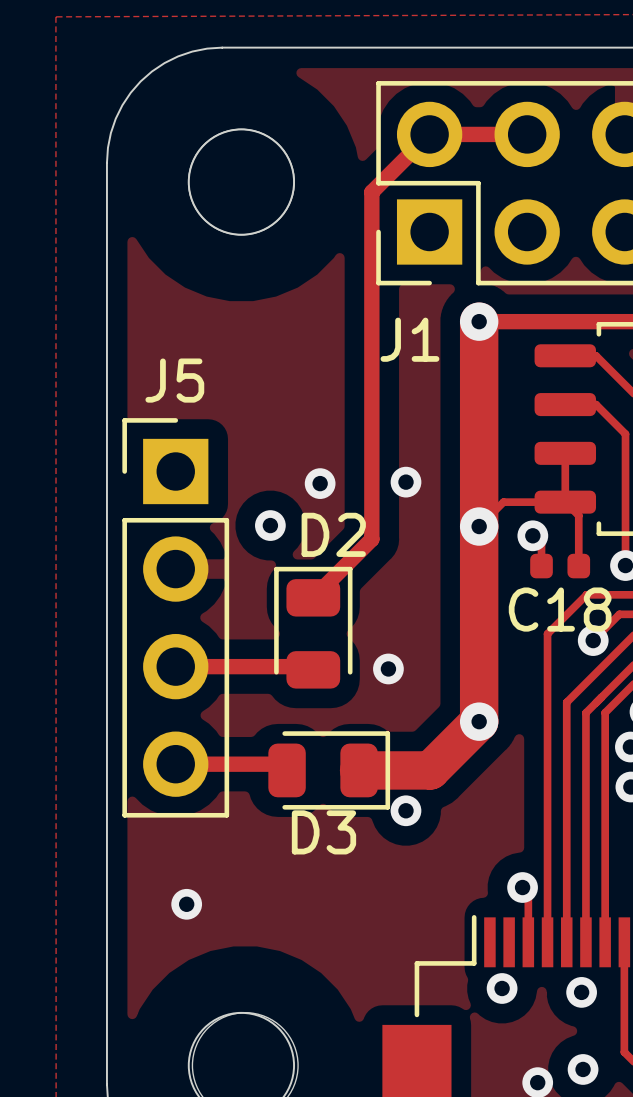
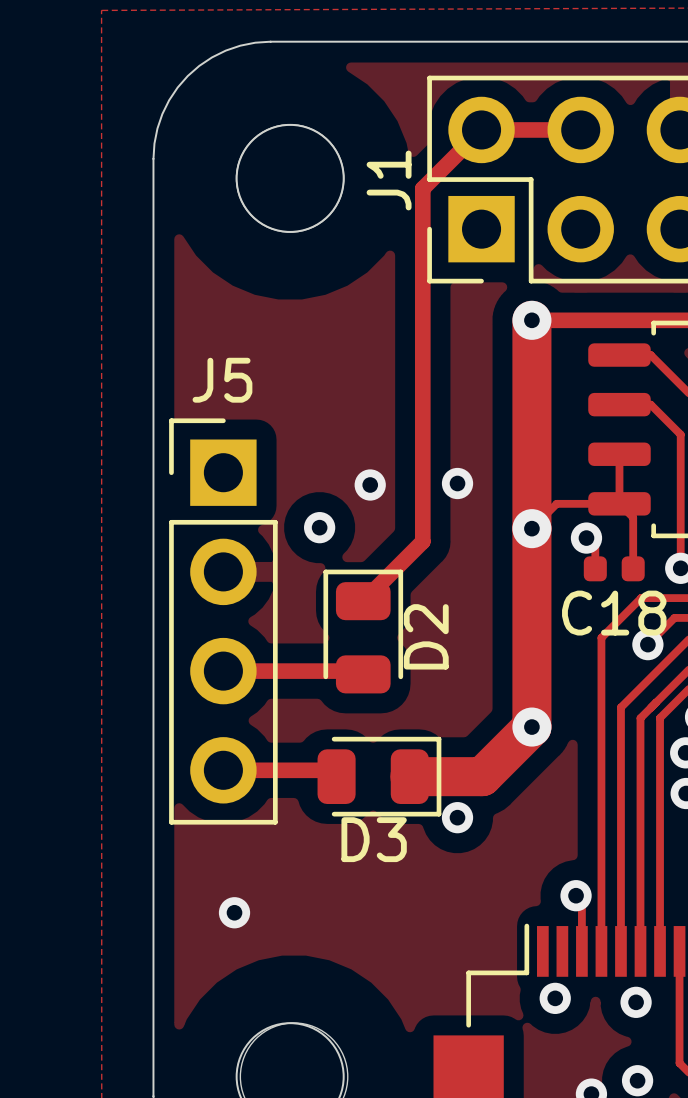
J1 name rotation: 0° (409, 339) -> 90° counterclockwise (389, 180)
J1 name position: J1 (409, 339) -> J1 (389, 180)
D2 name rotation: 0° (333, 534) -> 90° counterclockwise (426, 636)
D2 name position: D2 (333, 534) -> D2 (426, 636)
via: (388, 668) -> none

